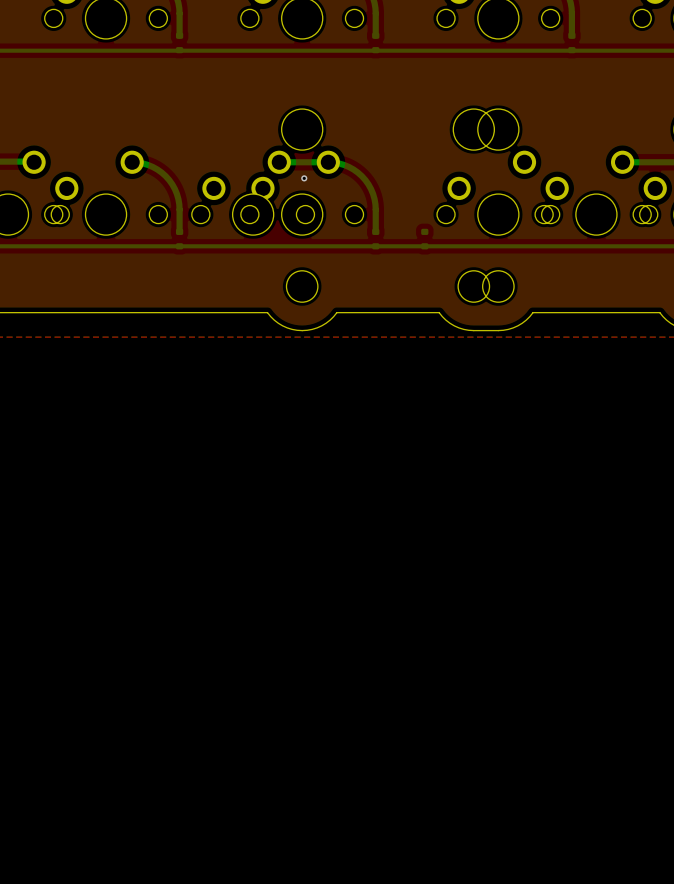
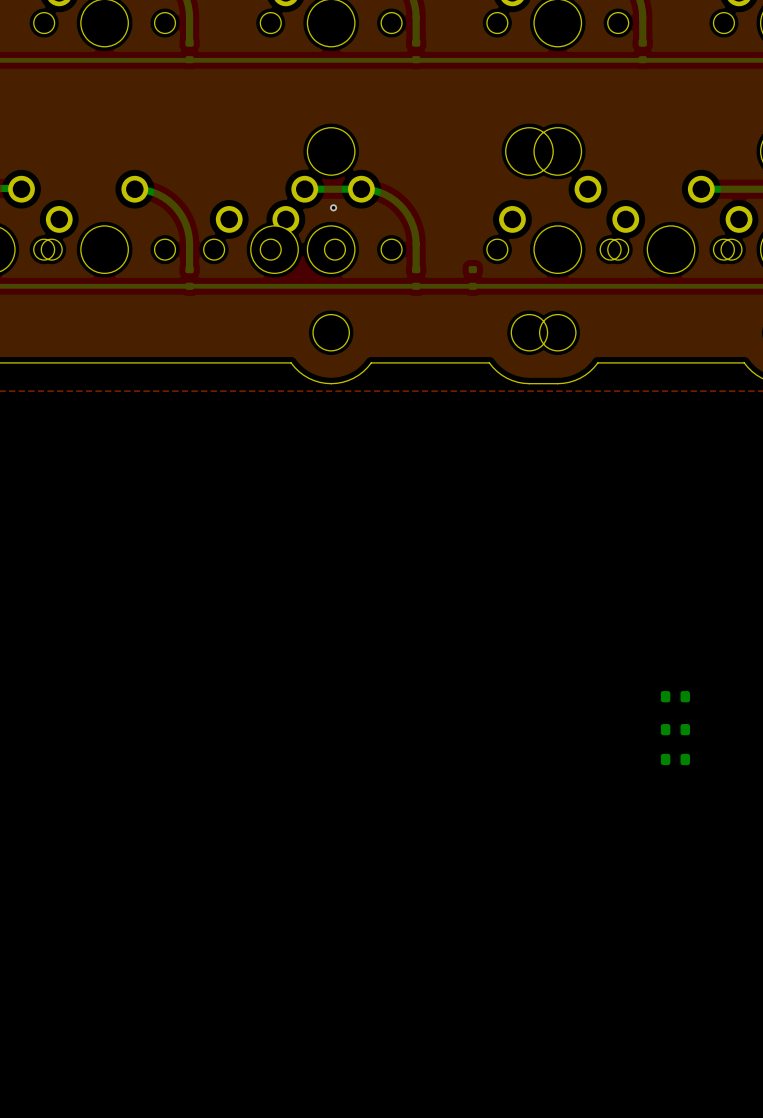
part: none -> (675, 696)
part: none -> (675, 729)
part: none -> (675, 759)

